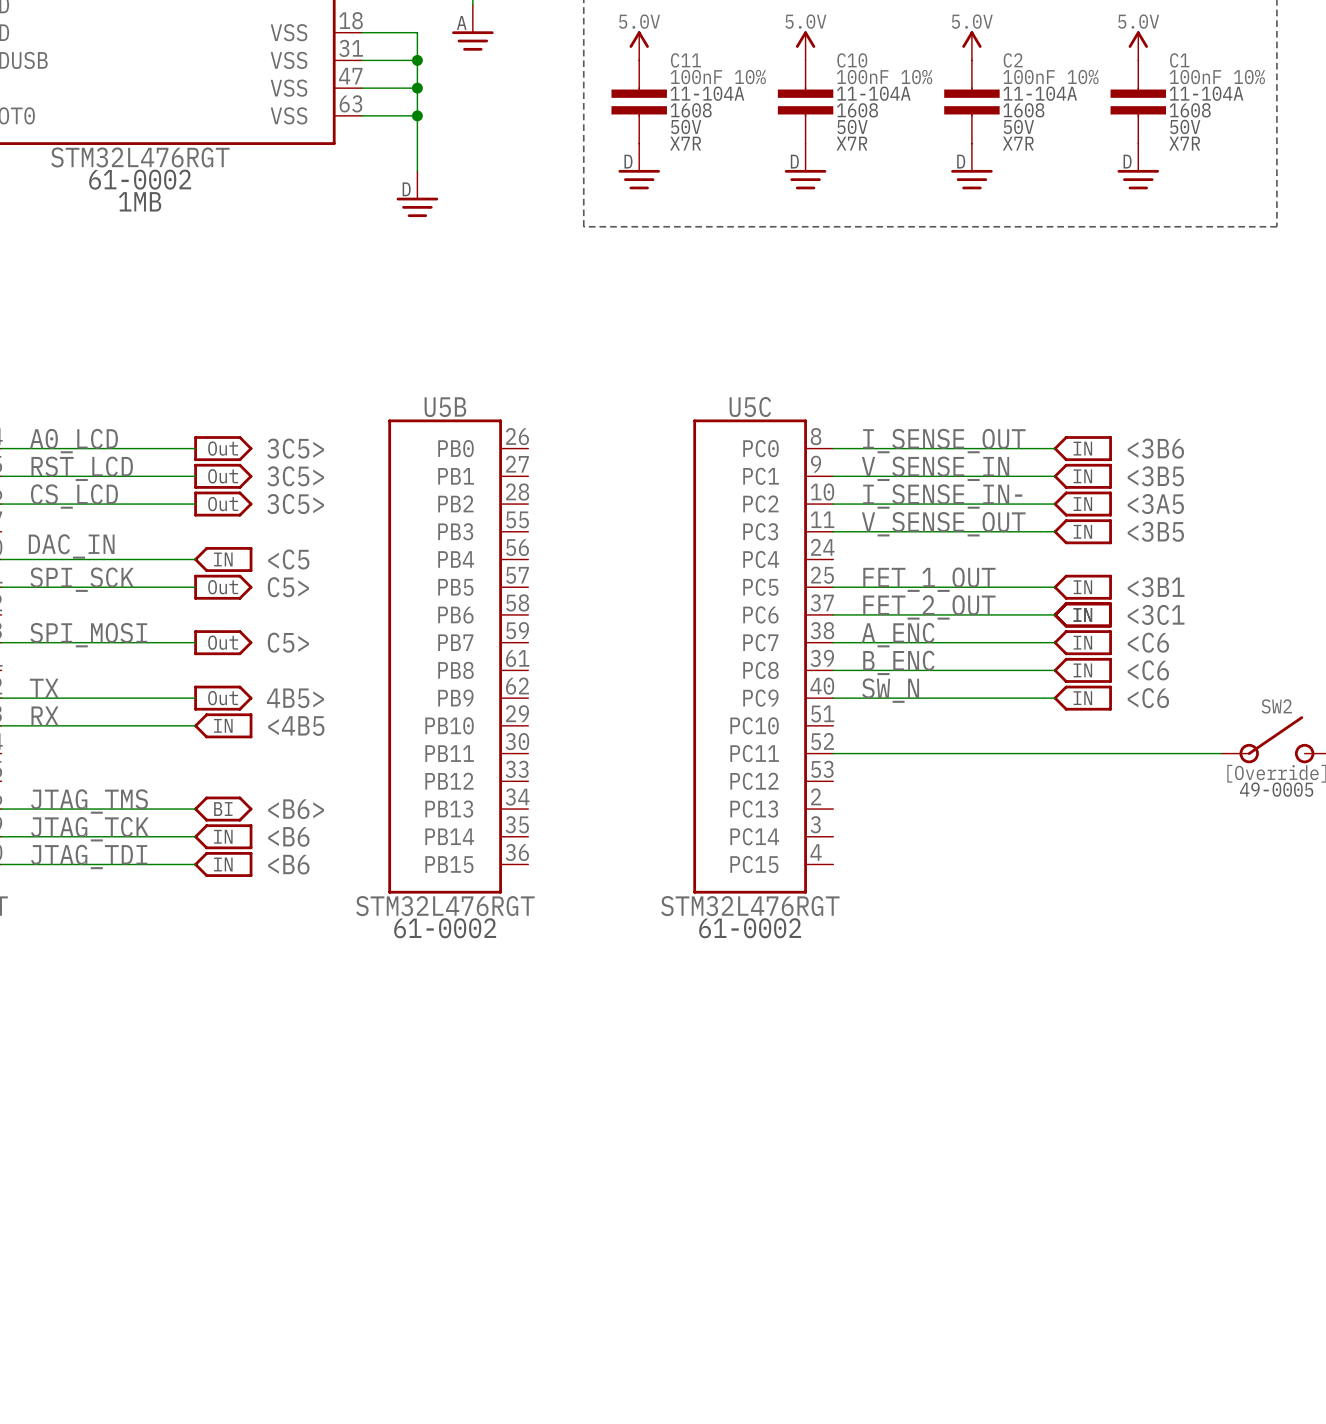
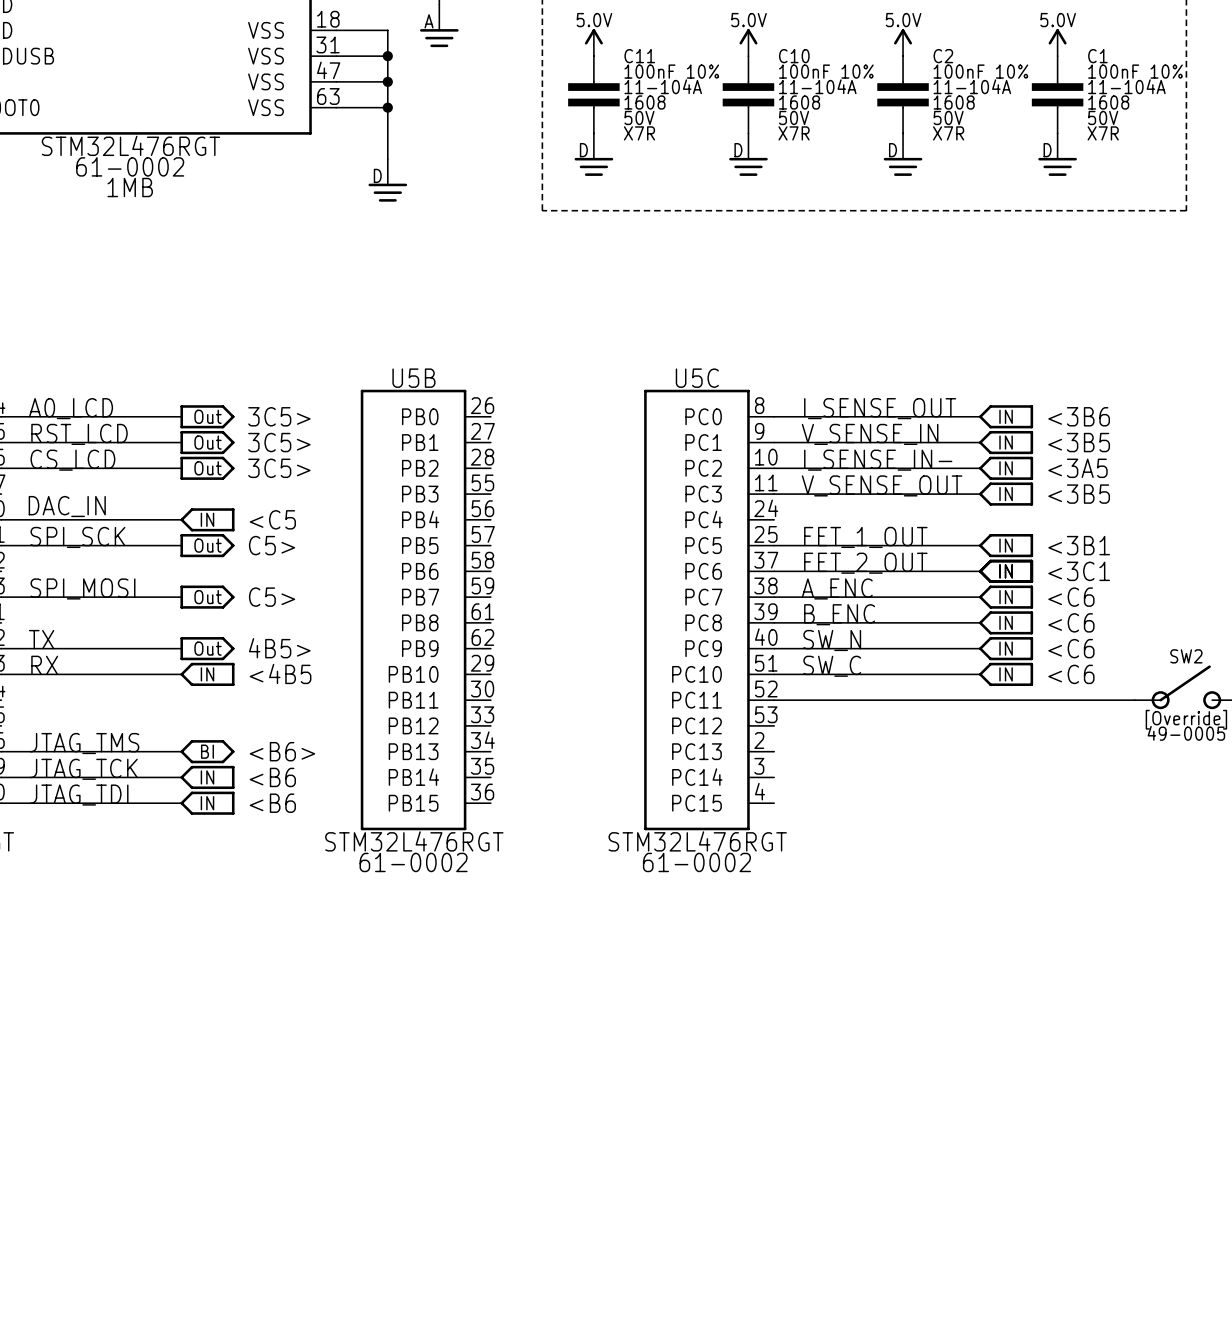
label: none -> SW_C (832, 666)
wire: none -> (774, 674) (980, 674)
part: none -> (1006, 674)
text: none -> <C6 (1071, 674)

